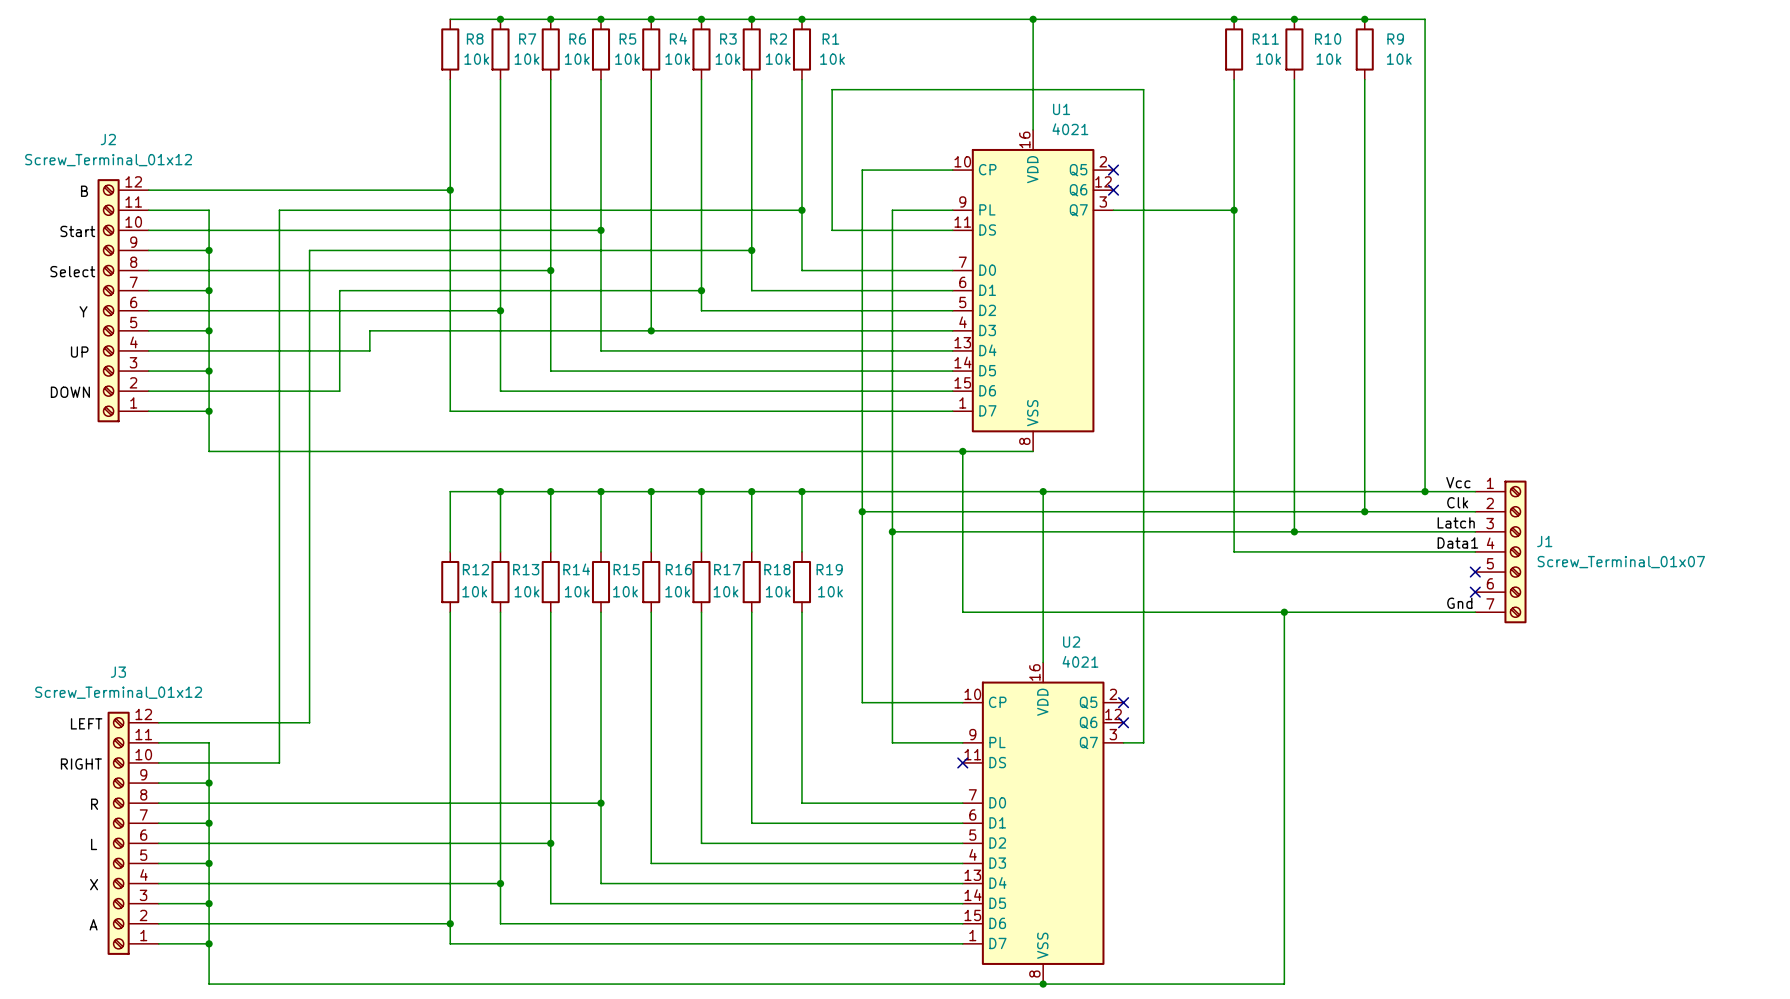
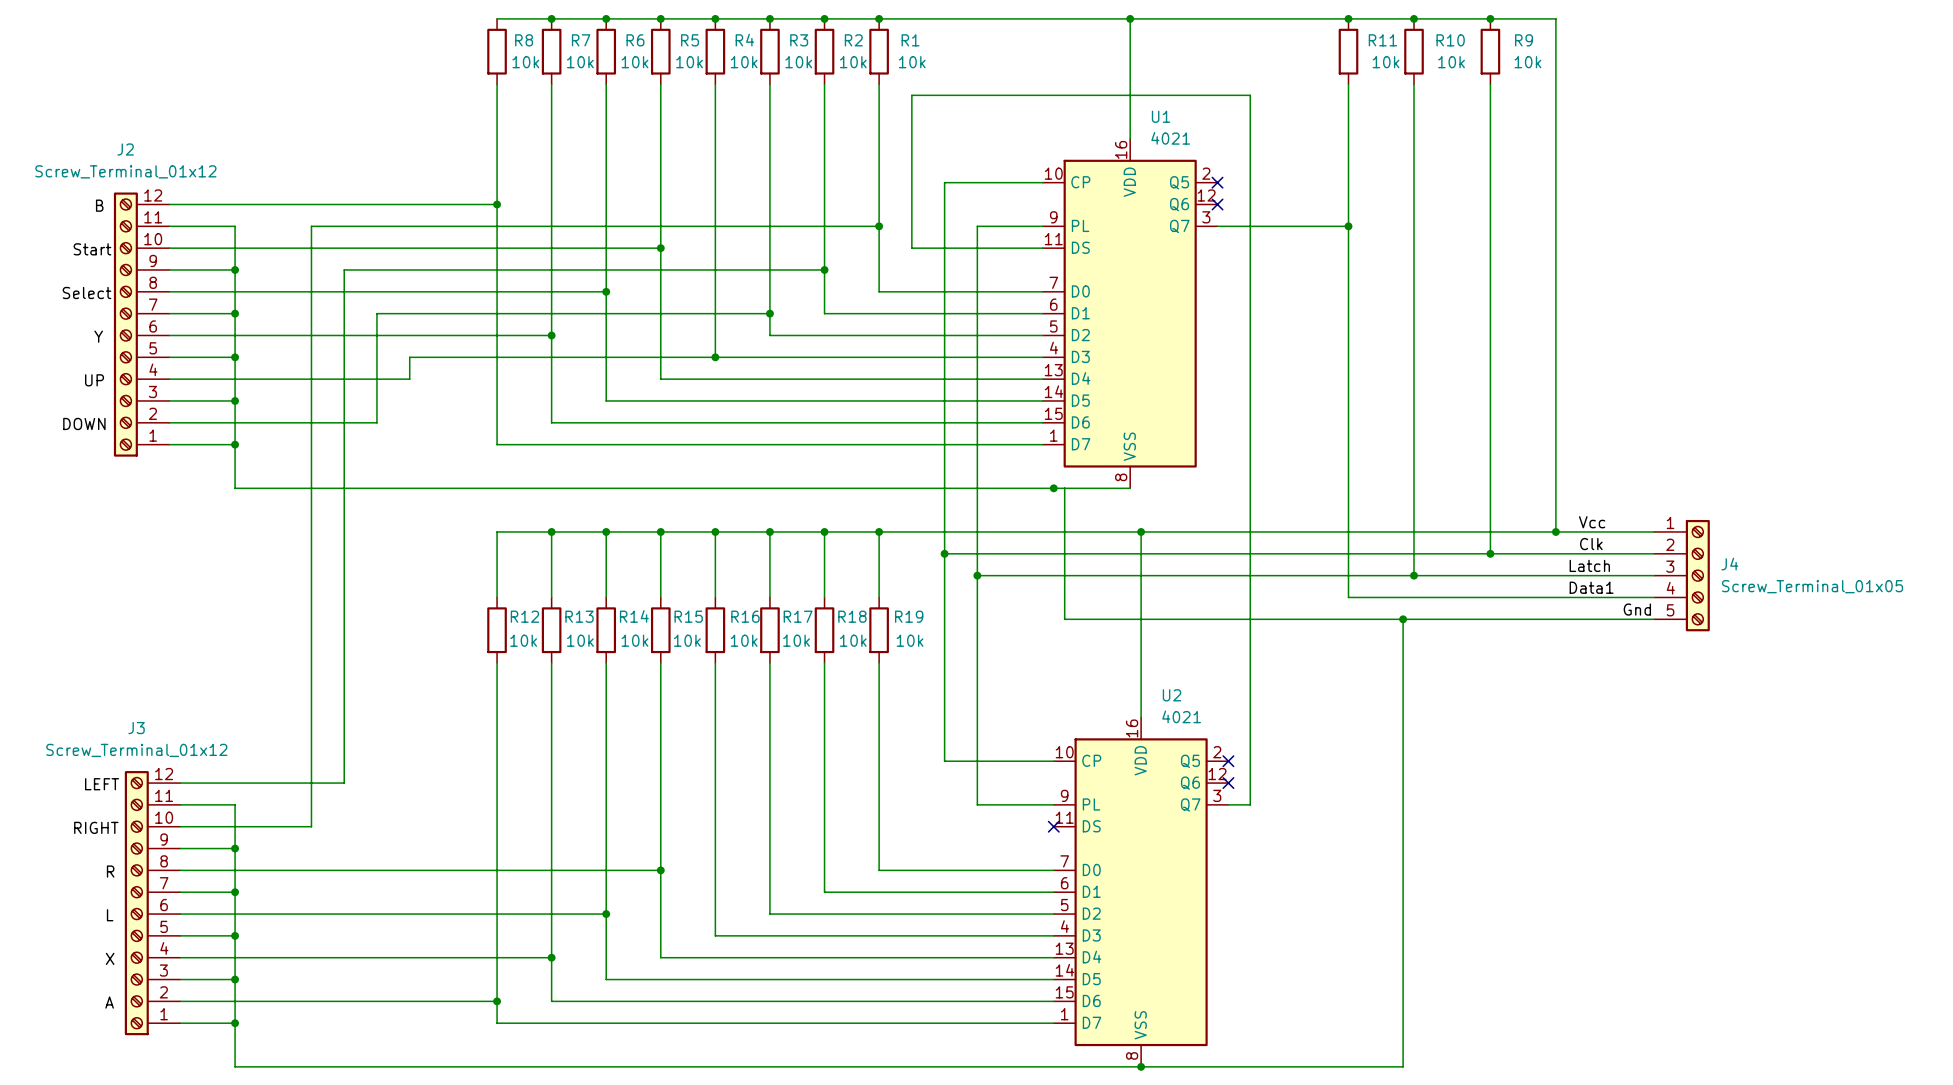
wire: (962, 451) (962, 612) (1475, 612) -> none
wire: none -> (1064, 488) (1064, 619) (1654, 619)
J4: none -> Screw_Terminal_01x05 (1681, 575)
J1: Screw_Terminal_01x07 (1500, 551) -> none
wire: none -> (1403, 619) (1403, 662)
no-connect mark: (1475, 572) -> none
no-connect mark: (1475, 592) -> none
label position: Gnd (1459, 603) -> Gnd (1637, 609)
junction position: (1284, 612) -> (1403, 619)

